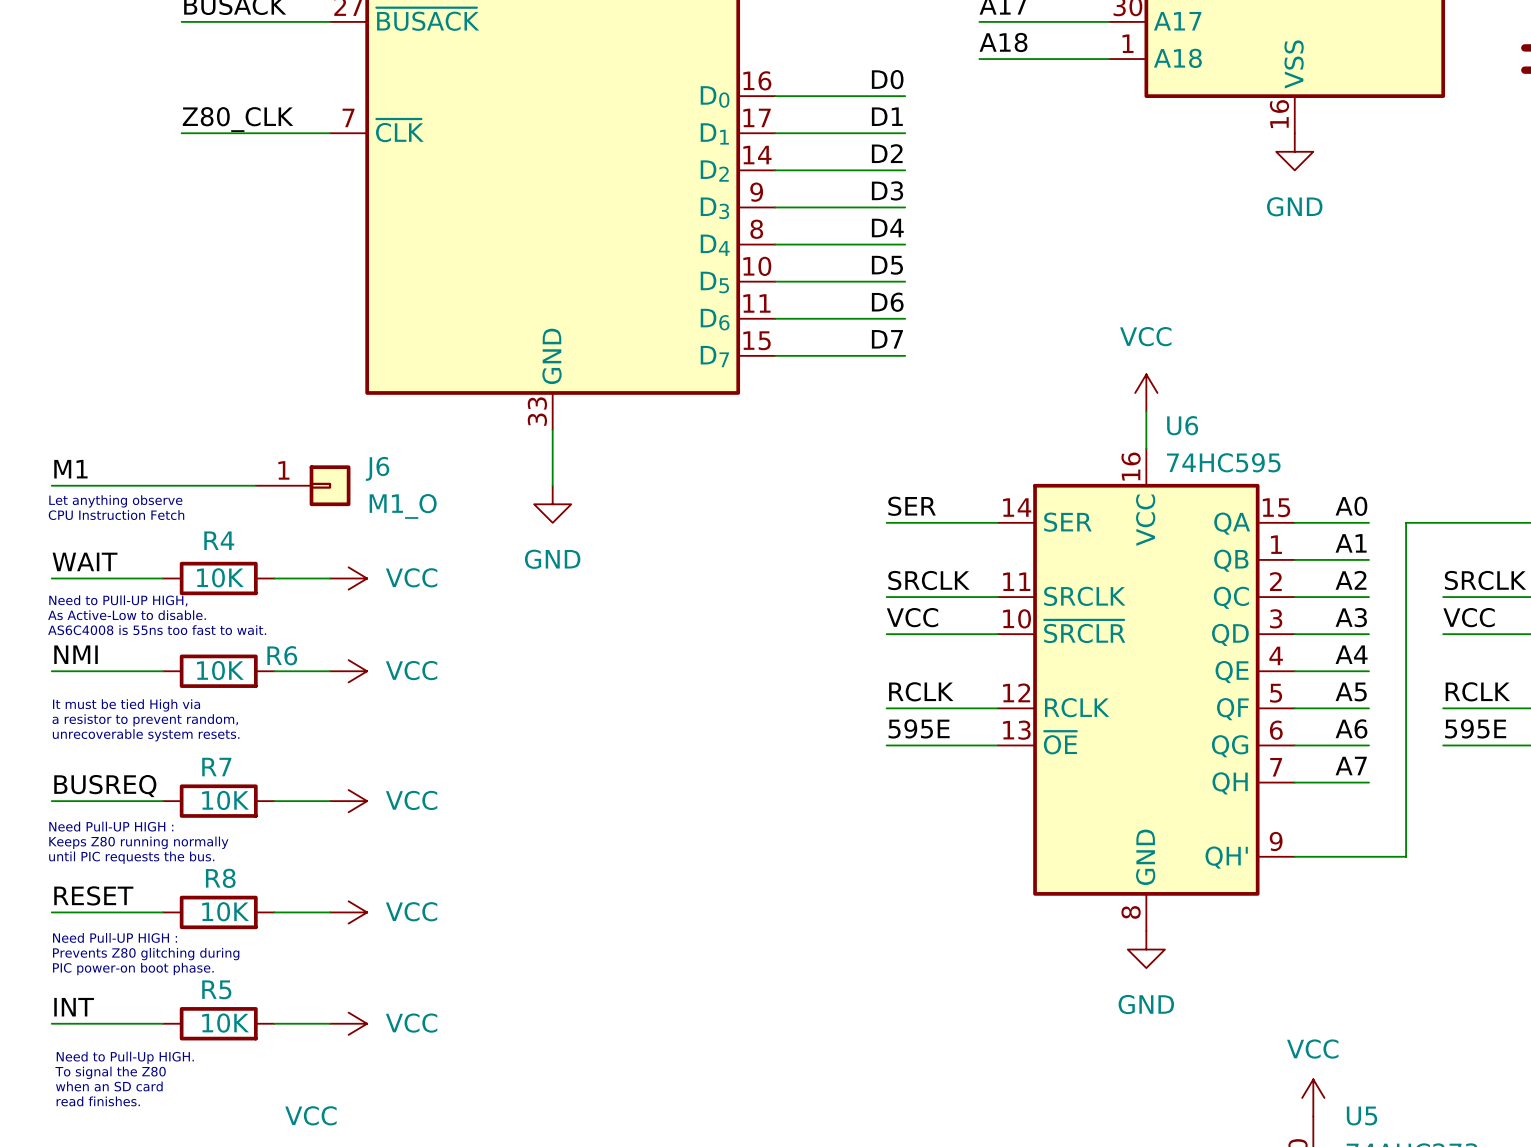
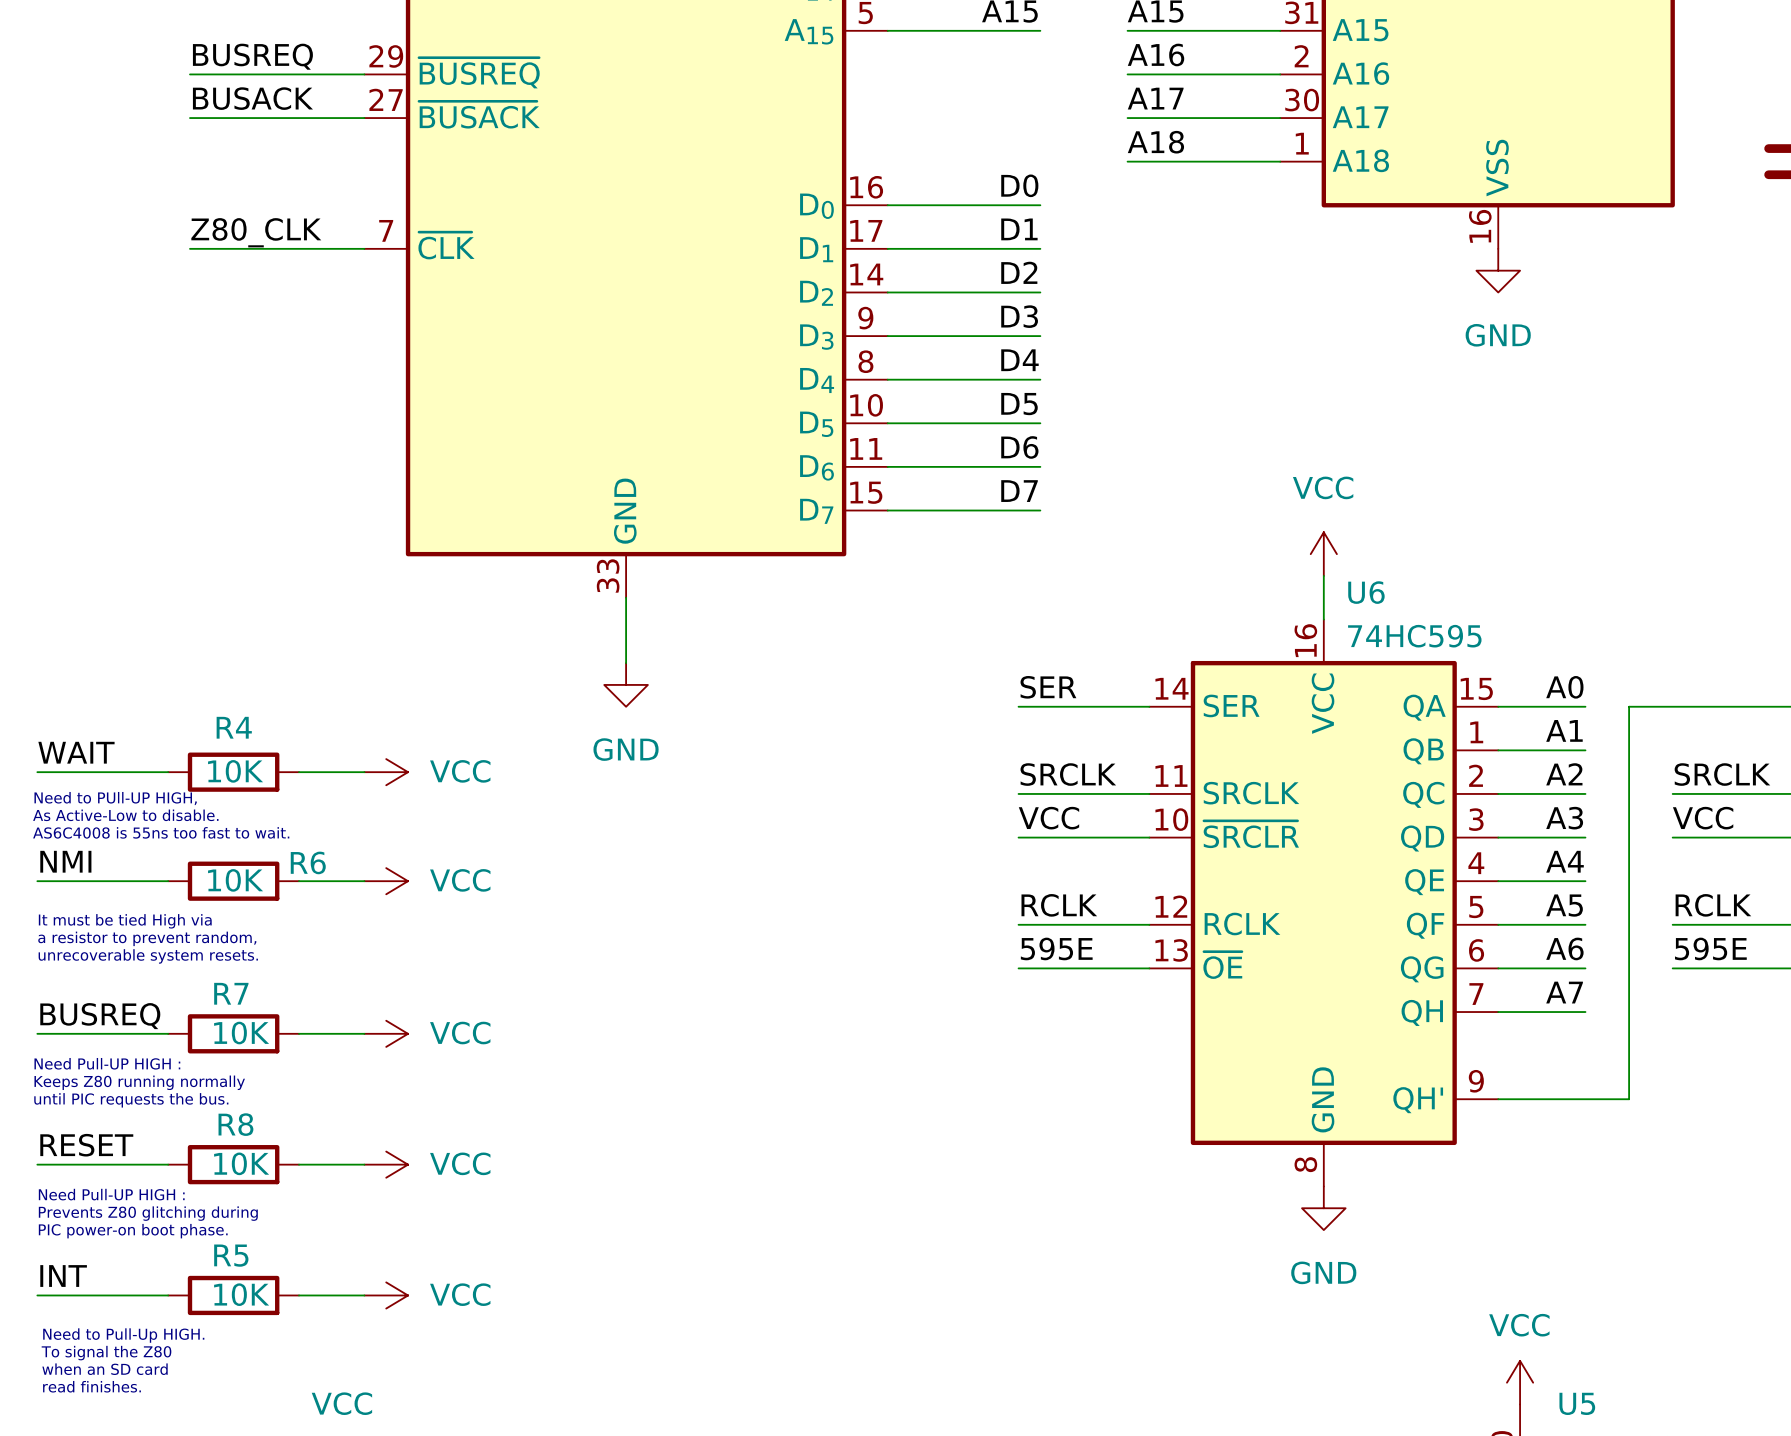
label: M1 (70, 469) -> none
wire: (51, 485) (255, 485) -> none
J6: M1_O (303, 485) -> none
text: Let anything observe (115, 501) -> none
text: CPU Instruction Fetch (116, 515) -> none

